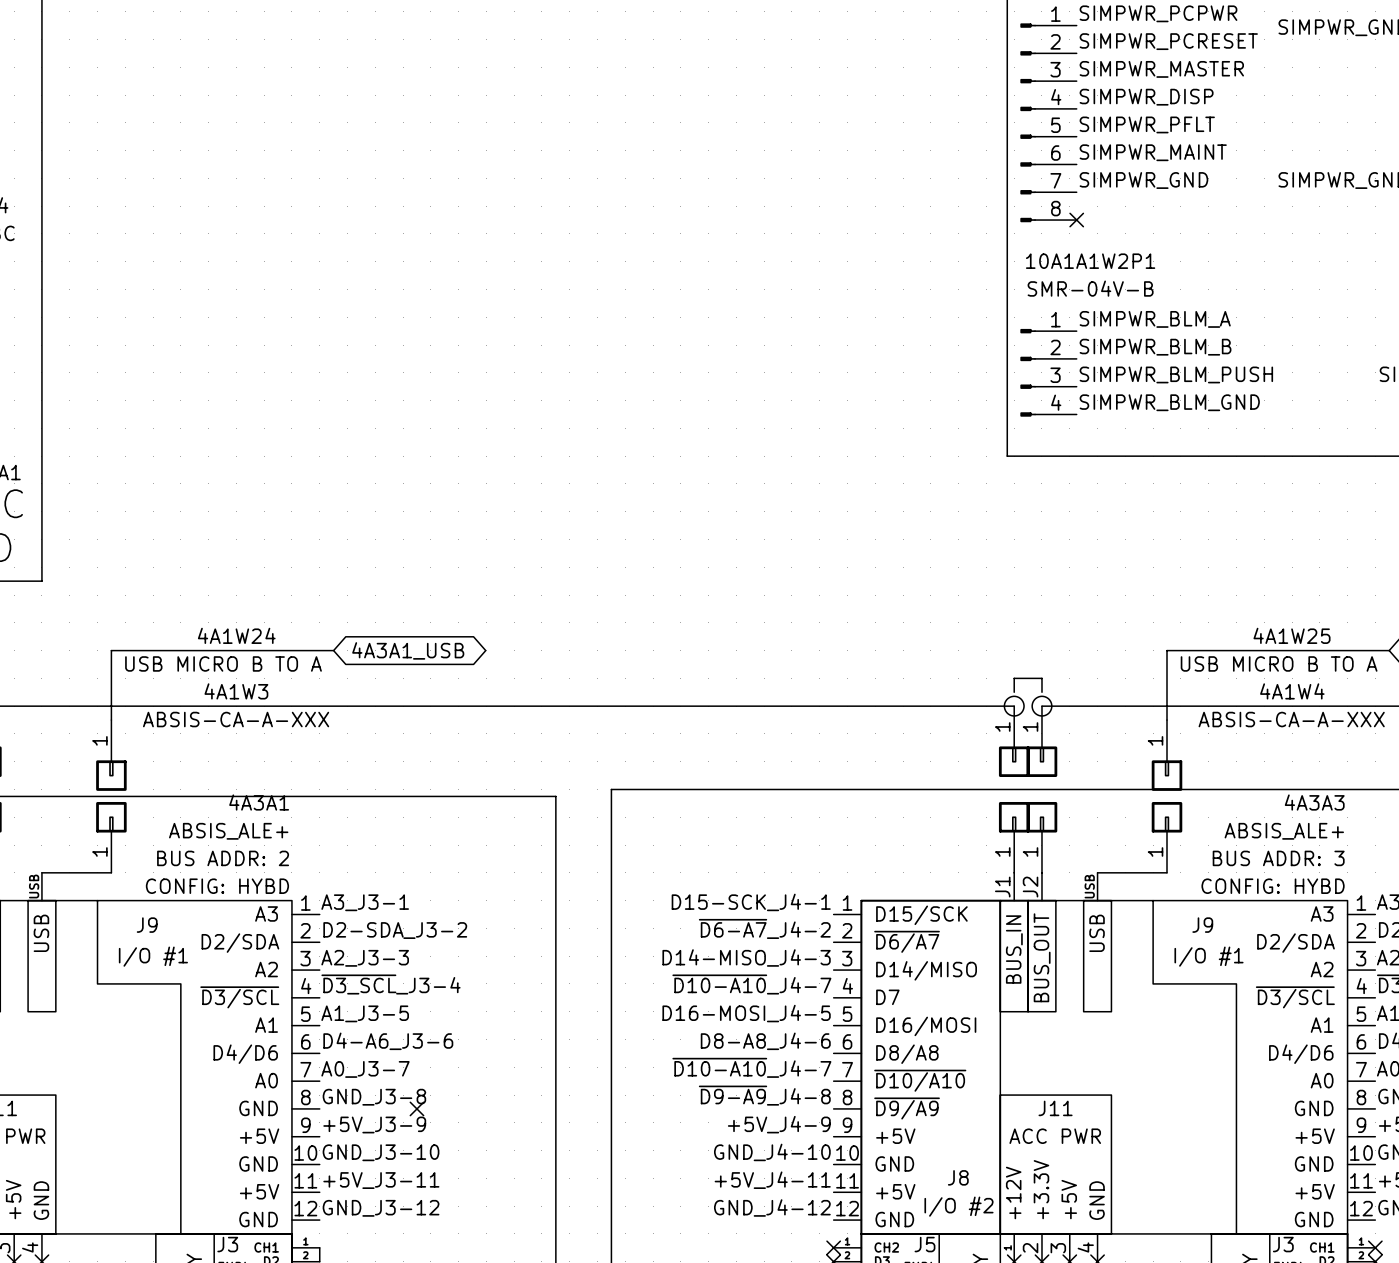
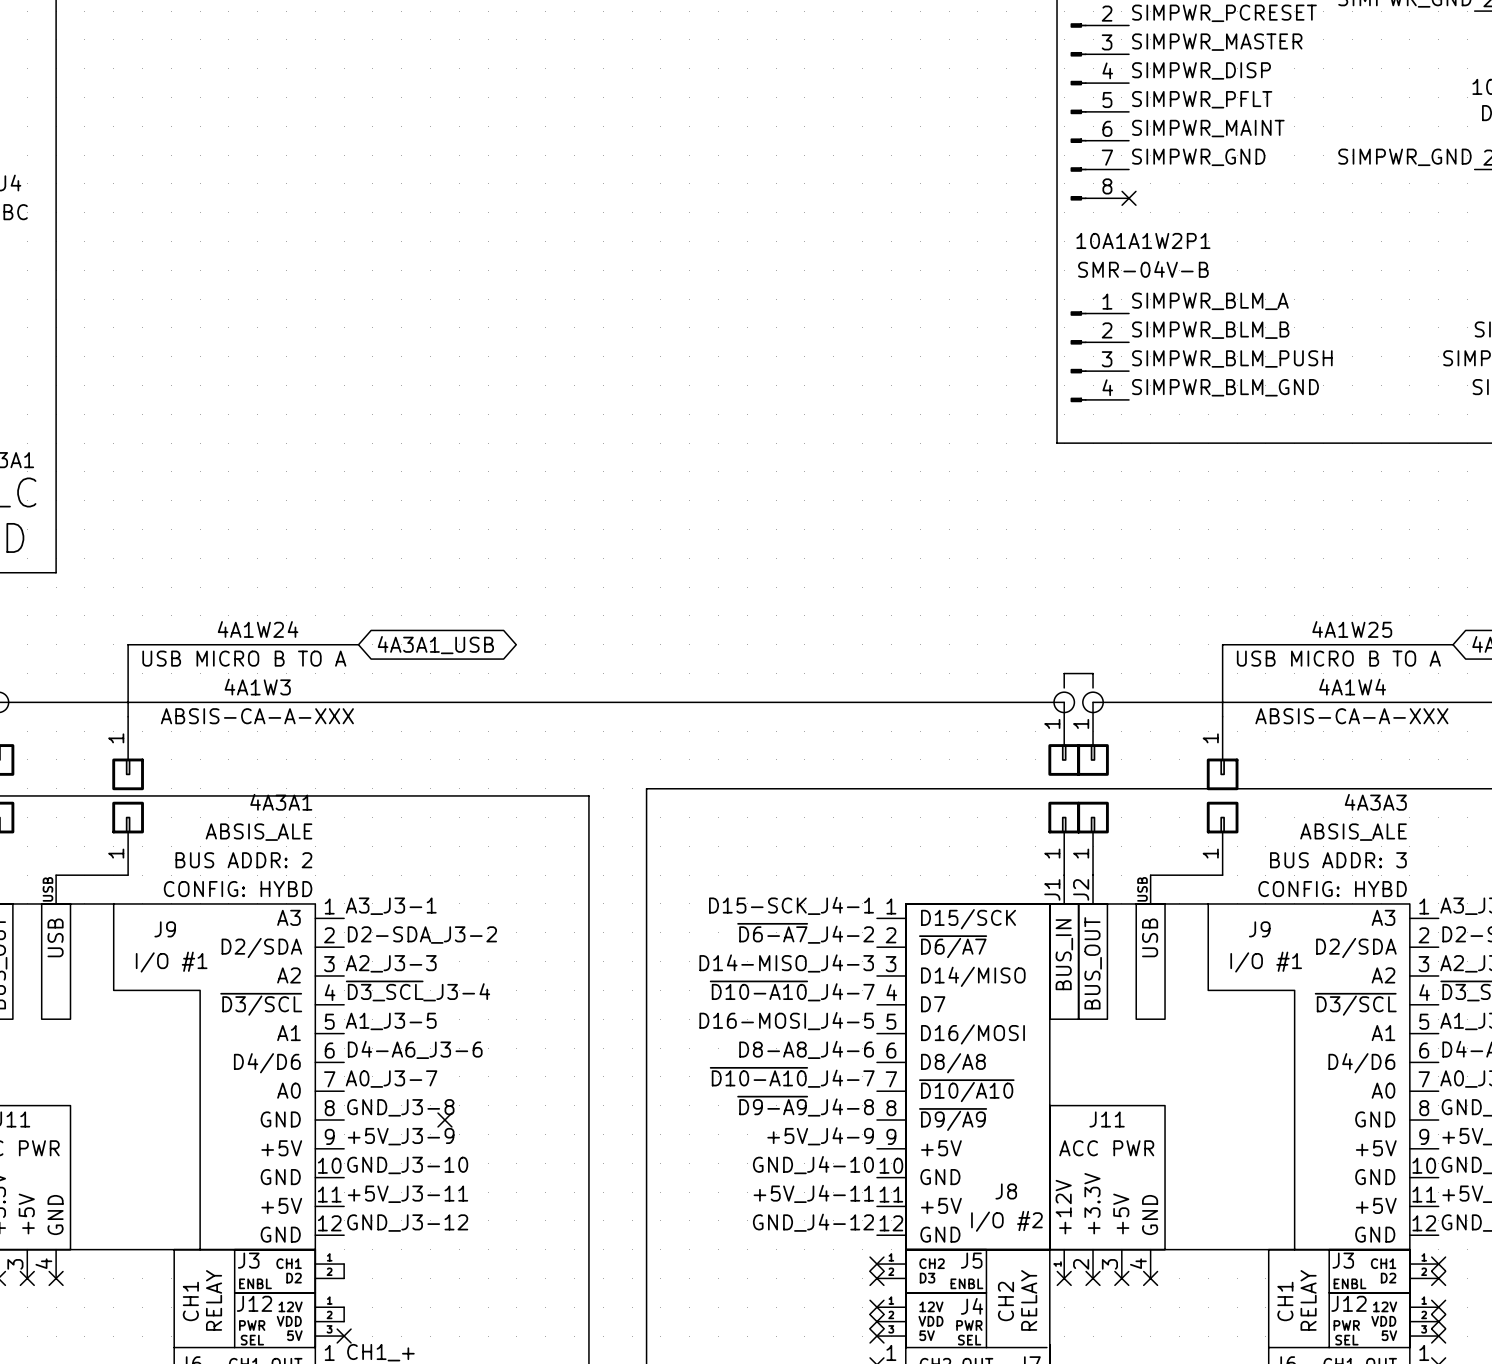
4A3A1 value: ABSIS_ALE+ (228, 831) -> ABSIS_ALE (258, 832)
4A3A3 value: ABSIS_ALE+ (1284, 831) -> ABSIS_ALE (1353, 832)

